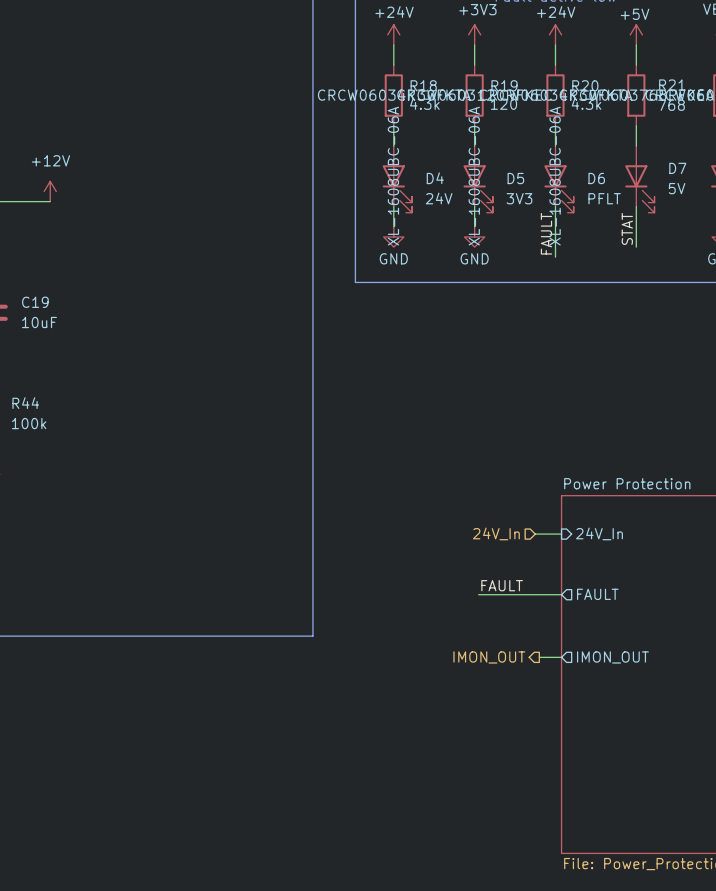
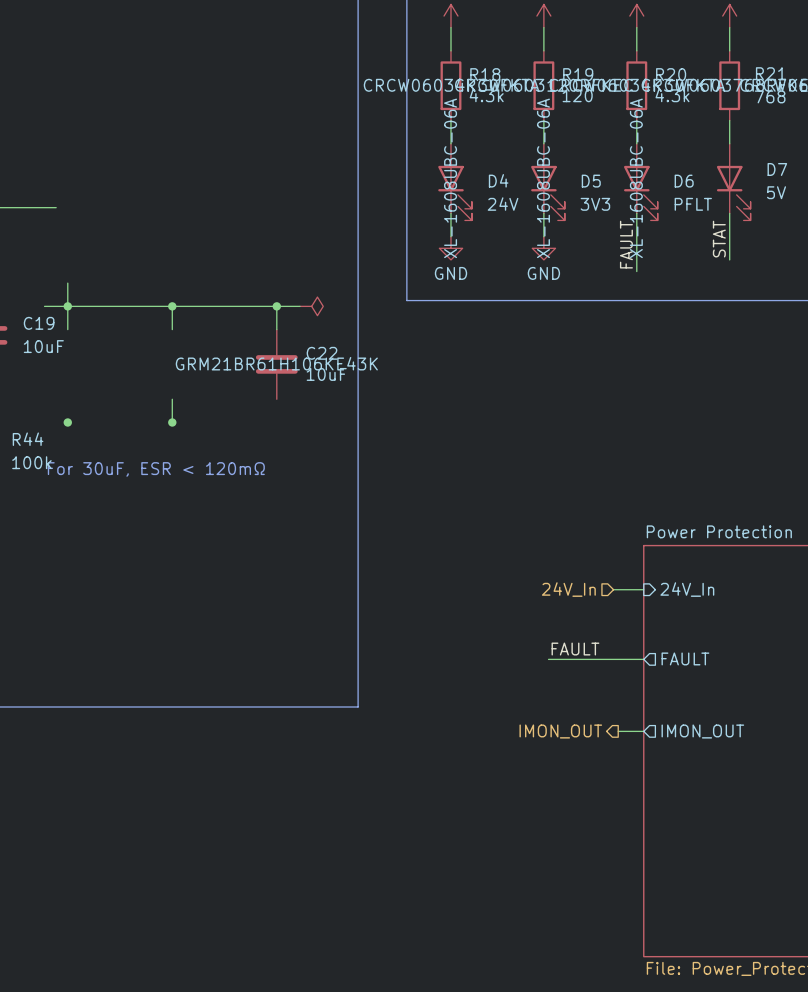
power symbol: +12V (50, 191) -> none
wire: none -> (67, 283) (67, 329)
wire: none -> (44, 306) (300, 306)
junction: none -> (67, 306)
wire: none -> (172, 306) (172, 329)
junction: none -> (172, 306)
wire: none -> (276, 306) (276, 329)
junction: none -> (276, 306)
power symbol: none -> (311, 306)
C22: none -> 10uF (276, 364)
wire: none -> (172, 399) (172, 422)
junction: none -> (67, 422)
junction: none -> (172, 422)
text: none -> For 30uF, ESR < 120mΩ (156, 469)

